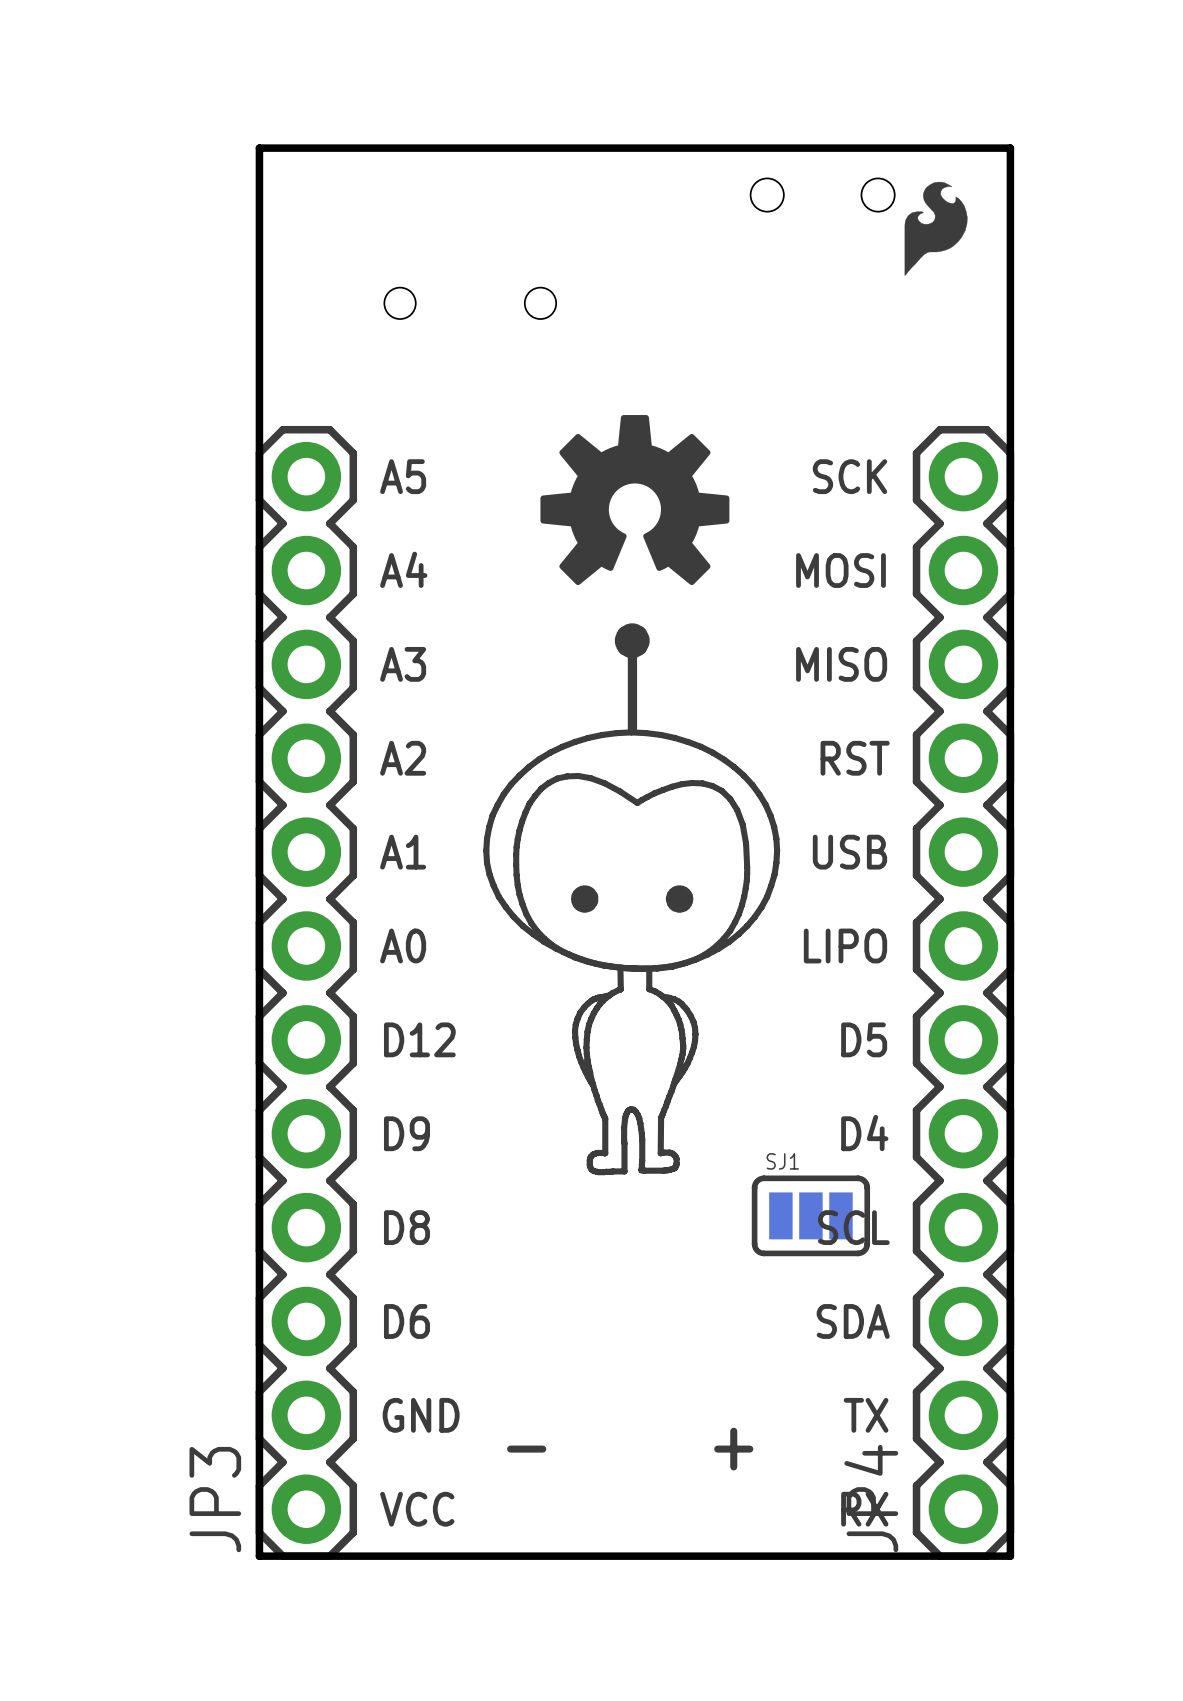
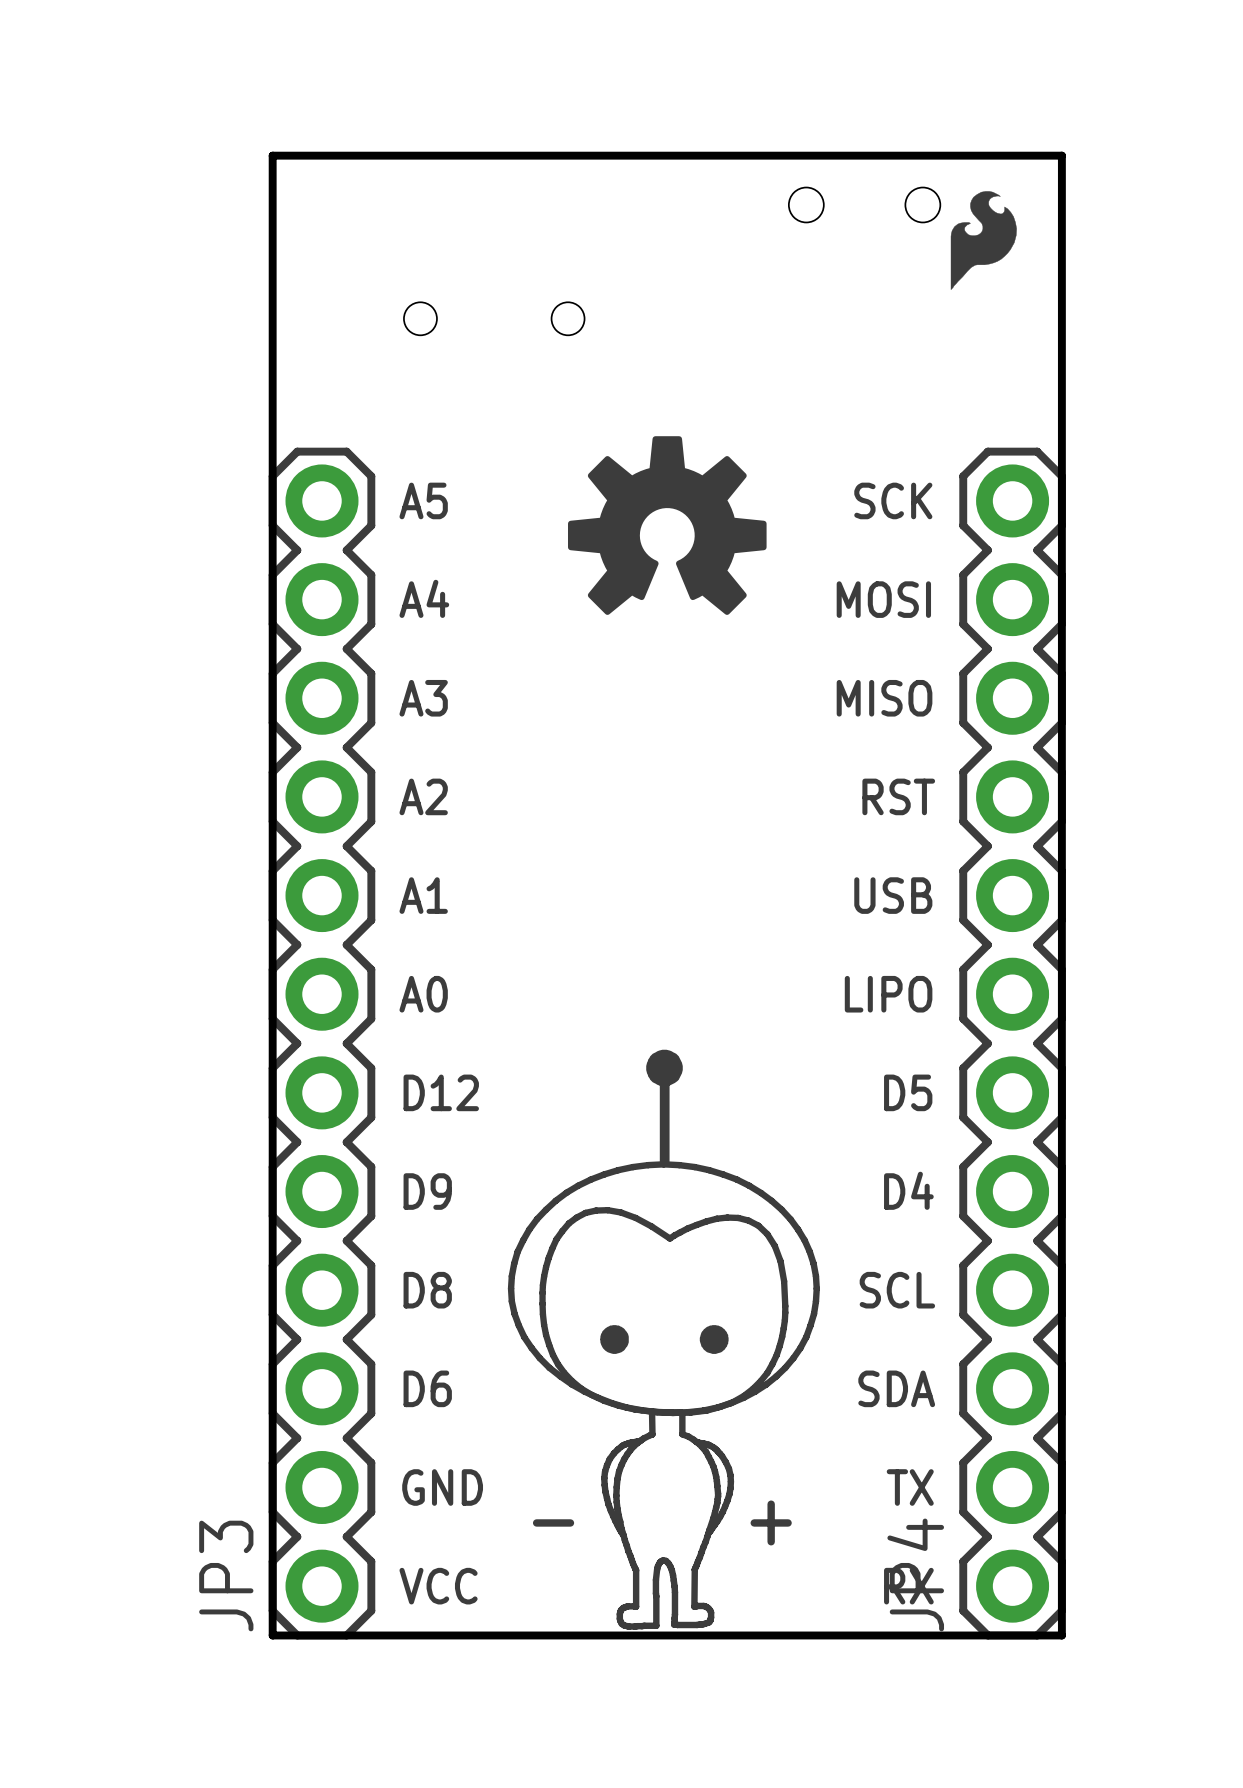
drawing position: (631, 899) -> (663, 1339)
SJ1: (810, 1215) -> none

